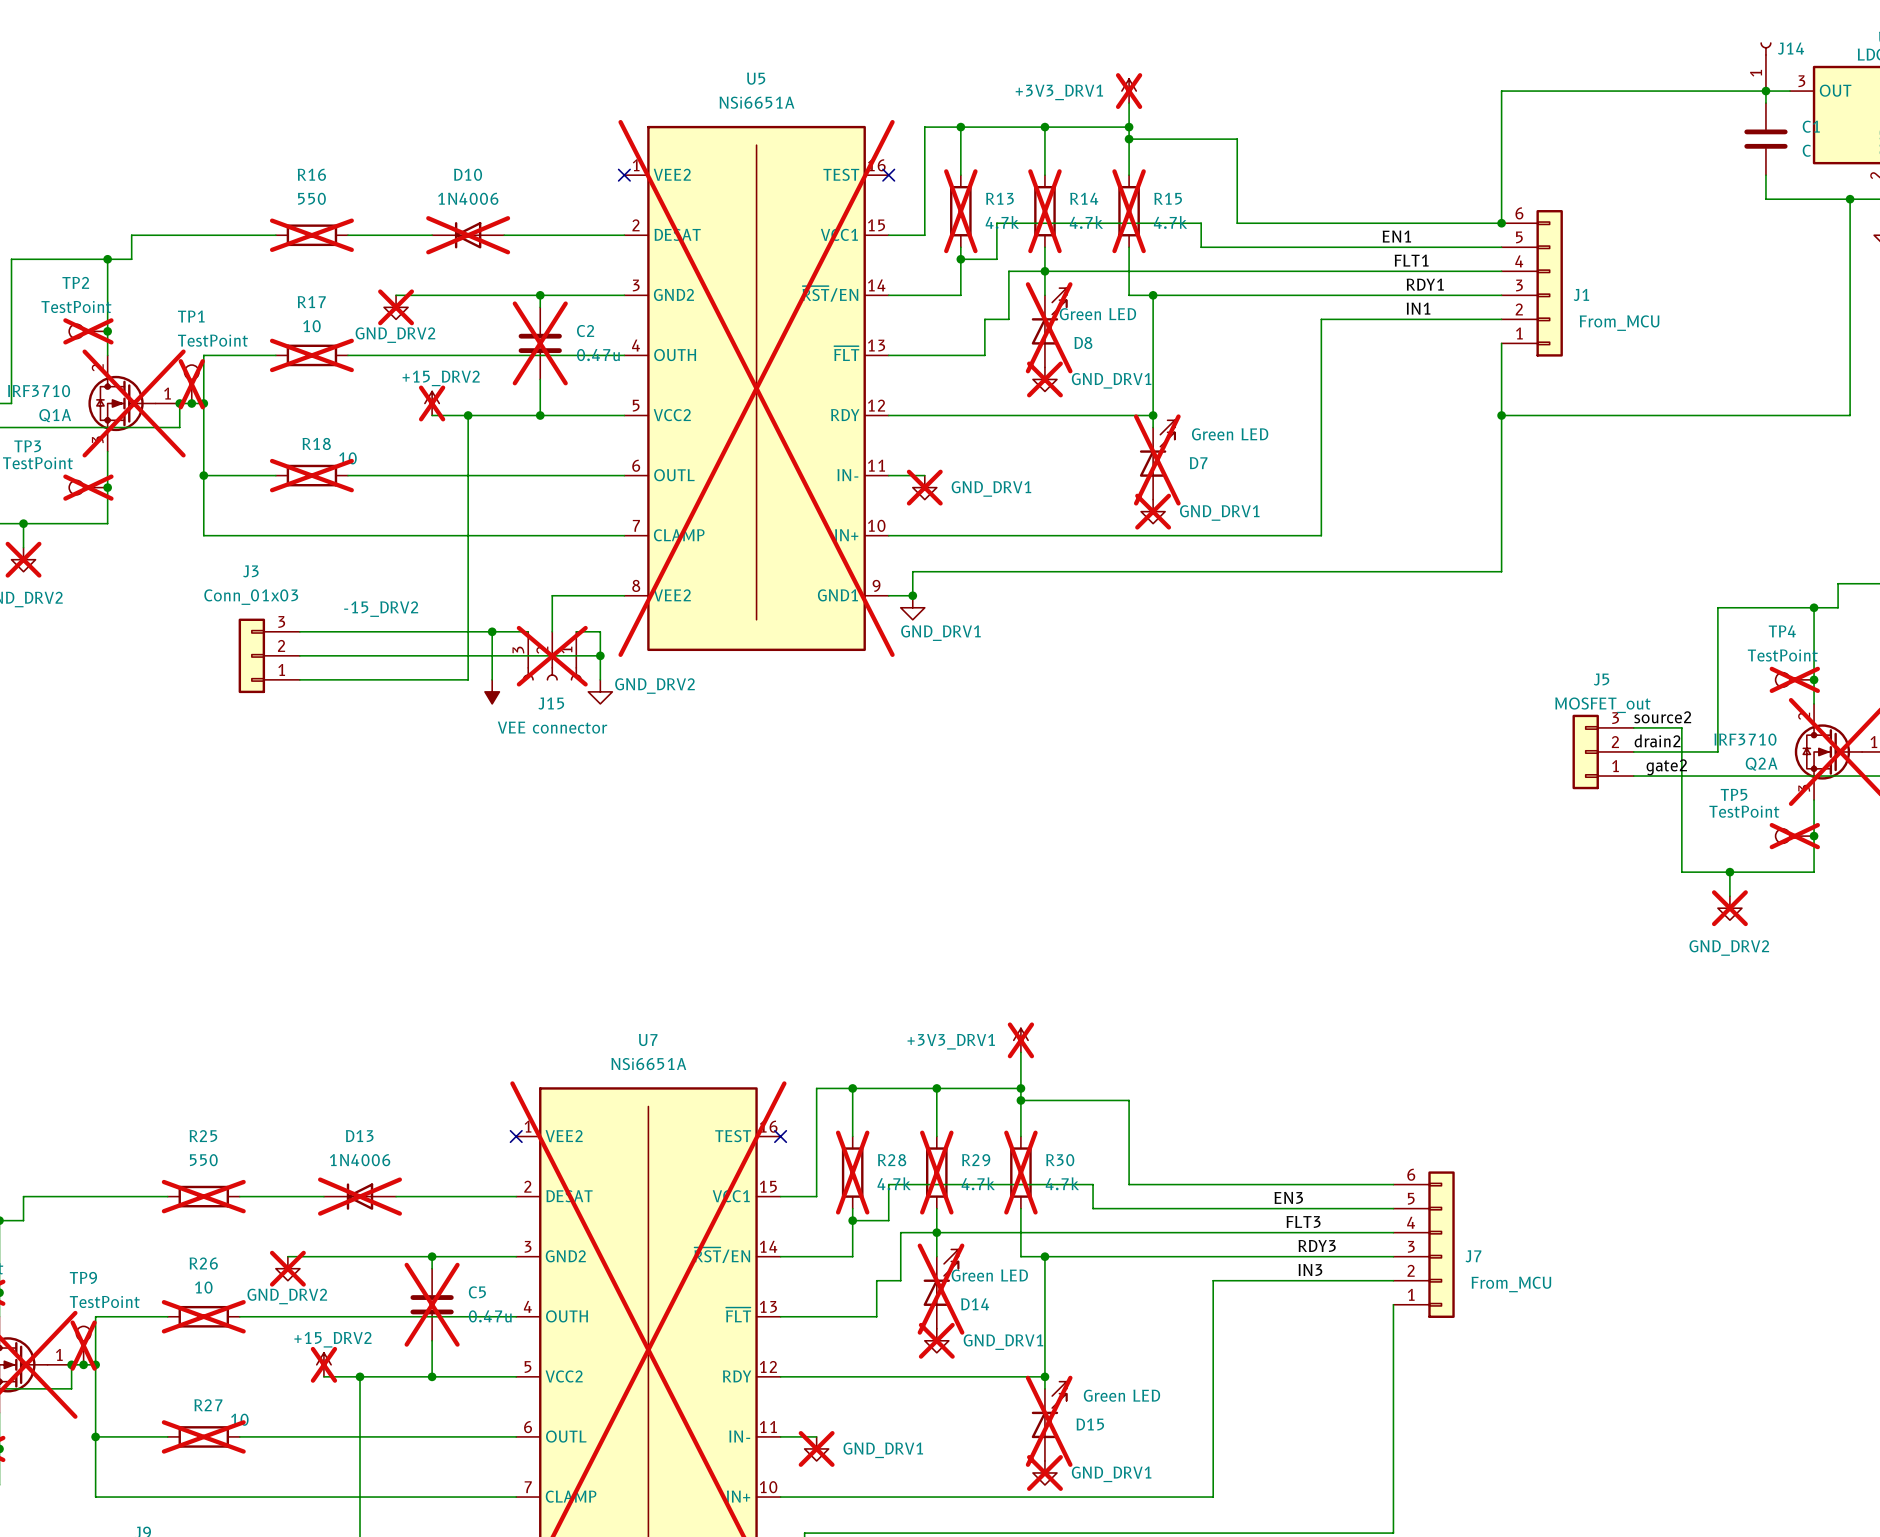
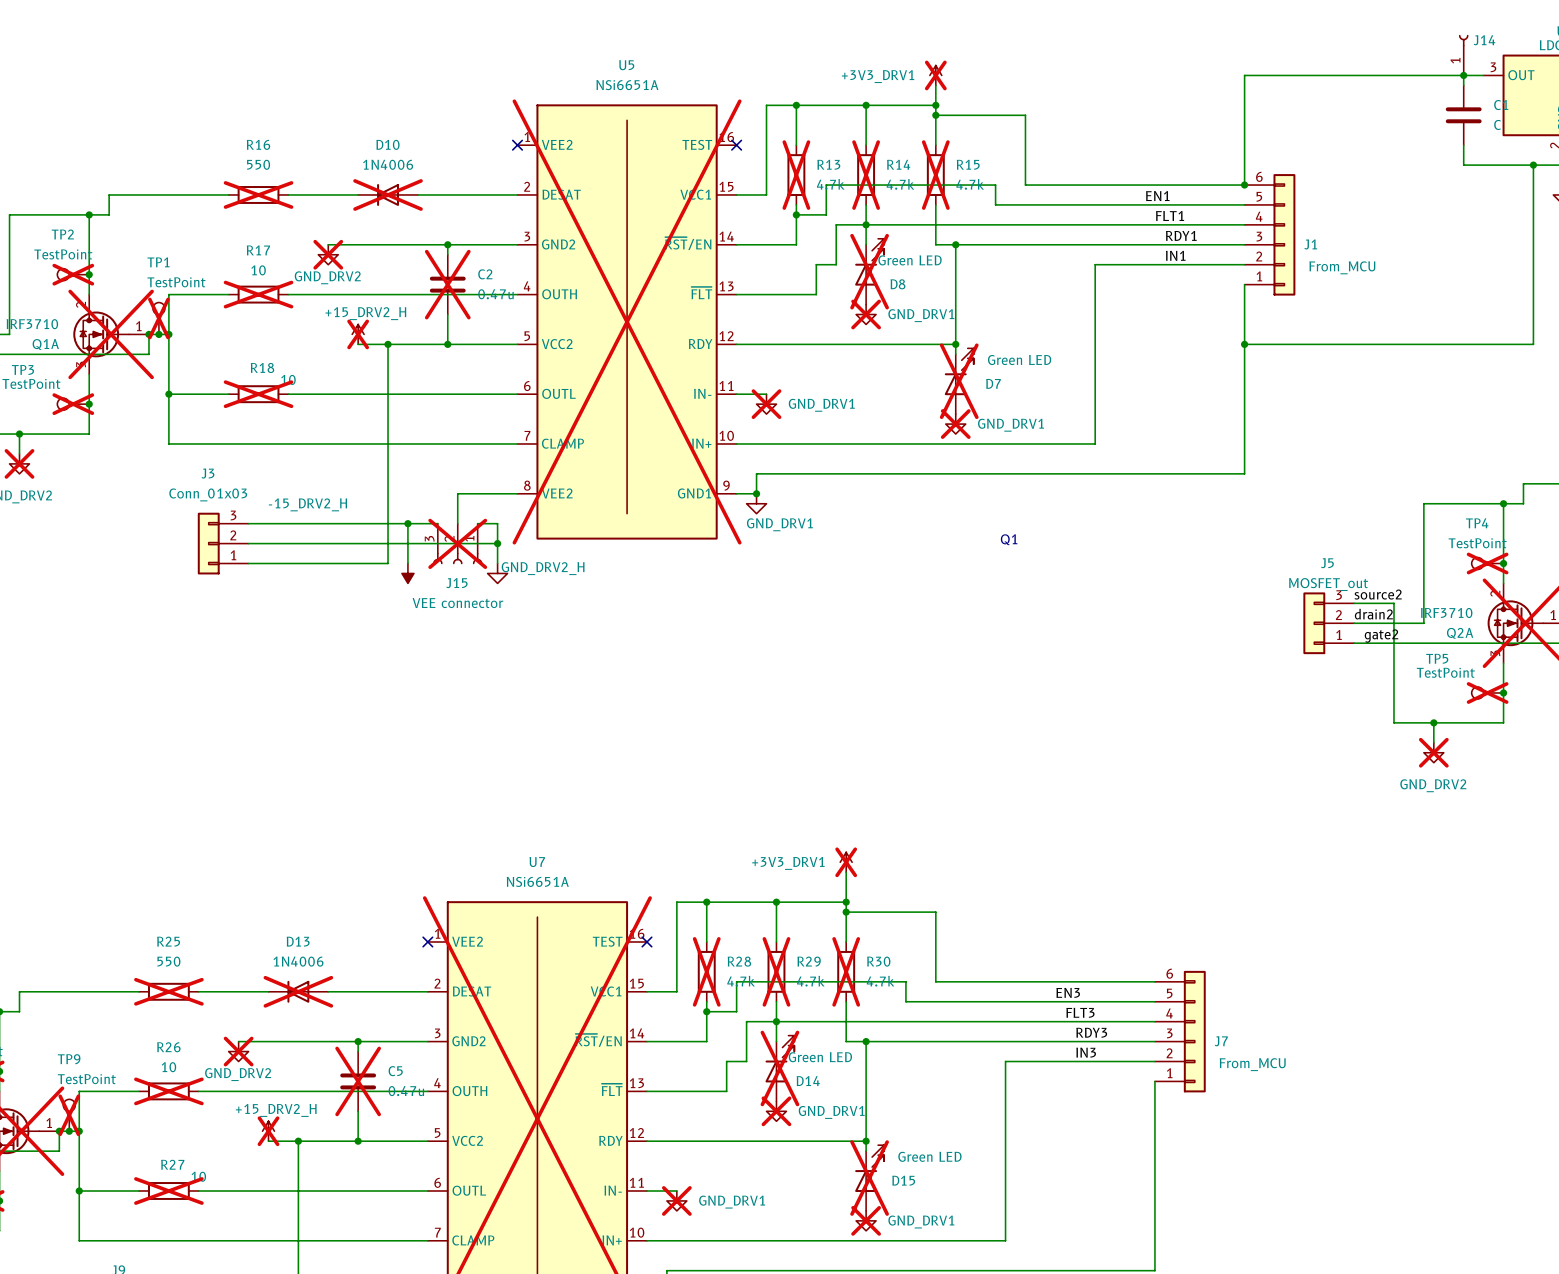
power symbol: +15_DRV2 (432, 403) -> +15_DRV2_H (358, 334)
text: none -> Q1 (1009, 539)
power symbol: -15_DRV2 (492, 691) -> -15_DRV2_H (407, 573)
power symbol: GND_DRV2 (600, 691) -> GND_DRV2_H (497, 573)
power symbol: +15_DRV2 (323, 1364) -> +15_DRV2_H (268, 1131)

